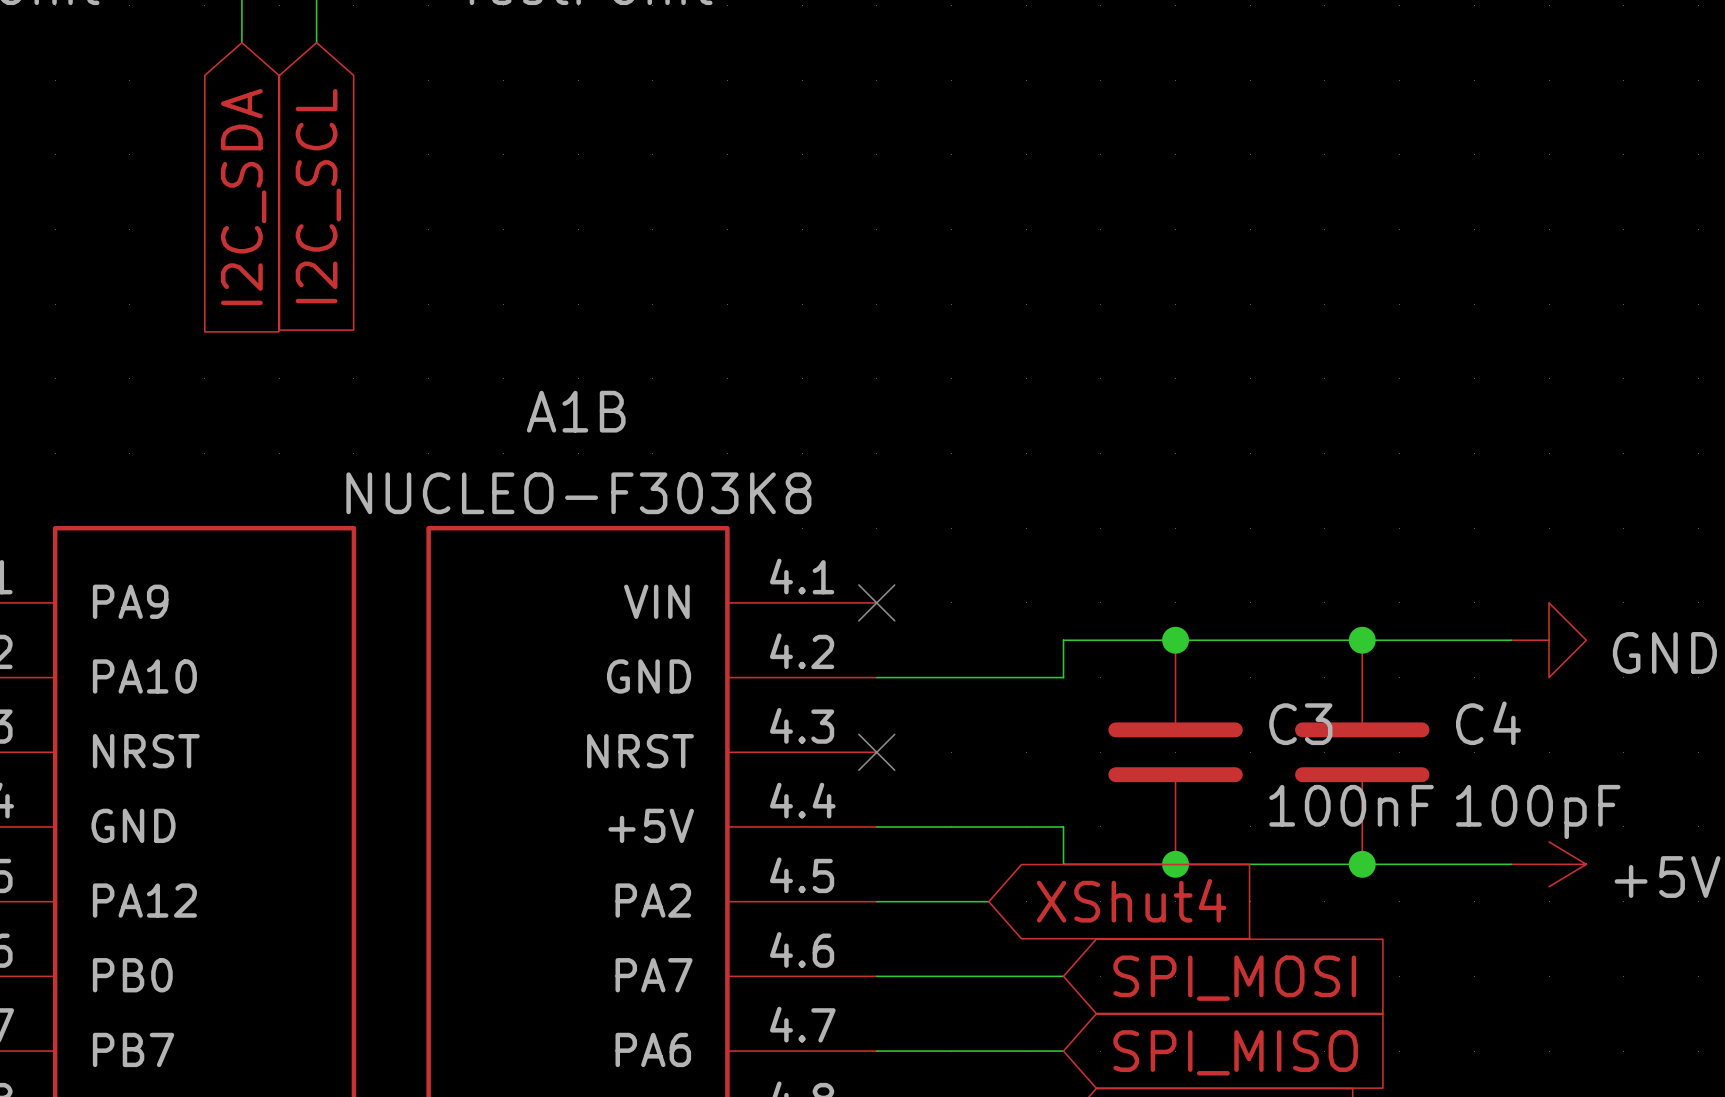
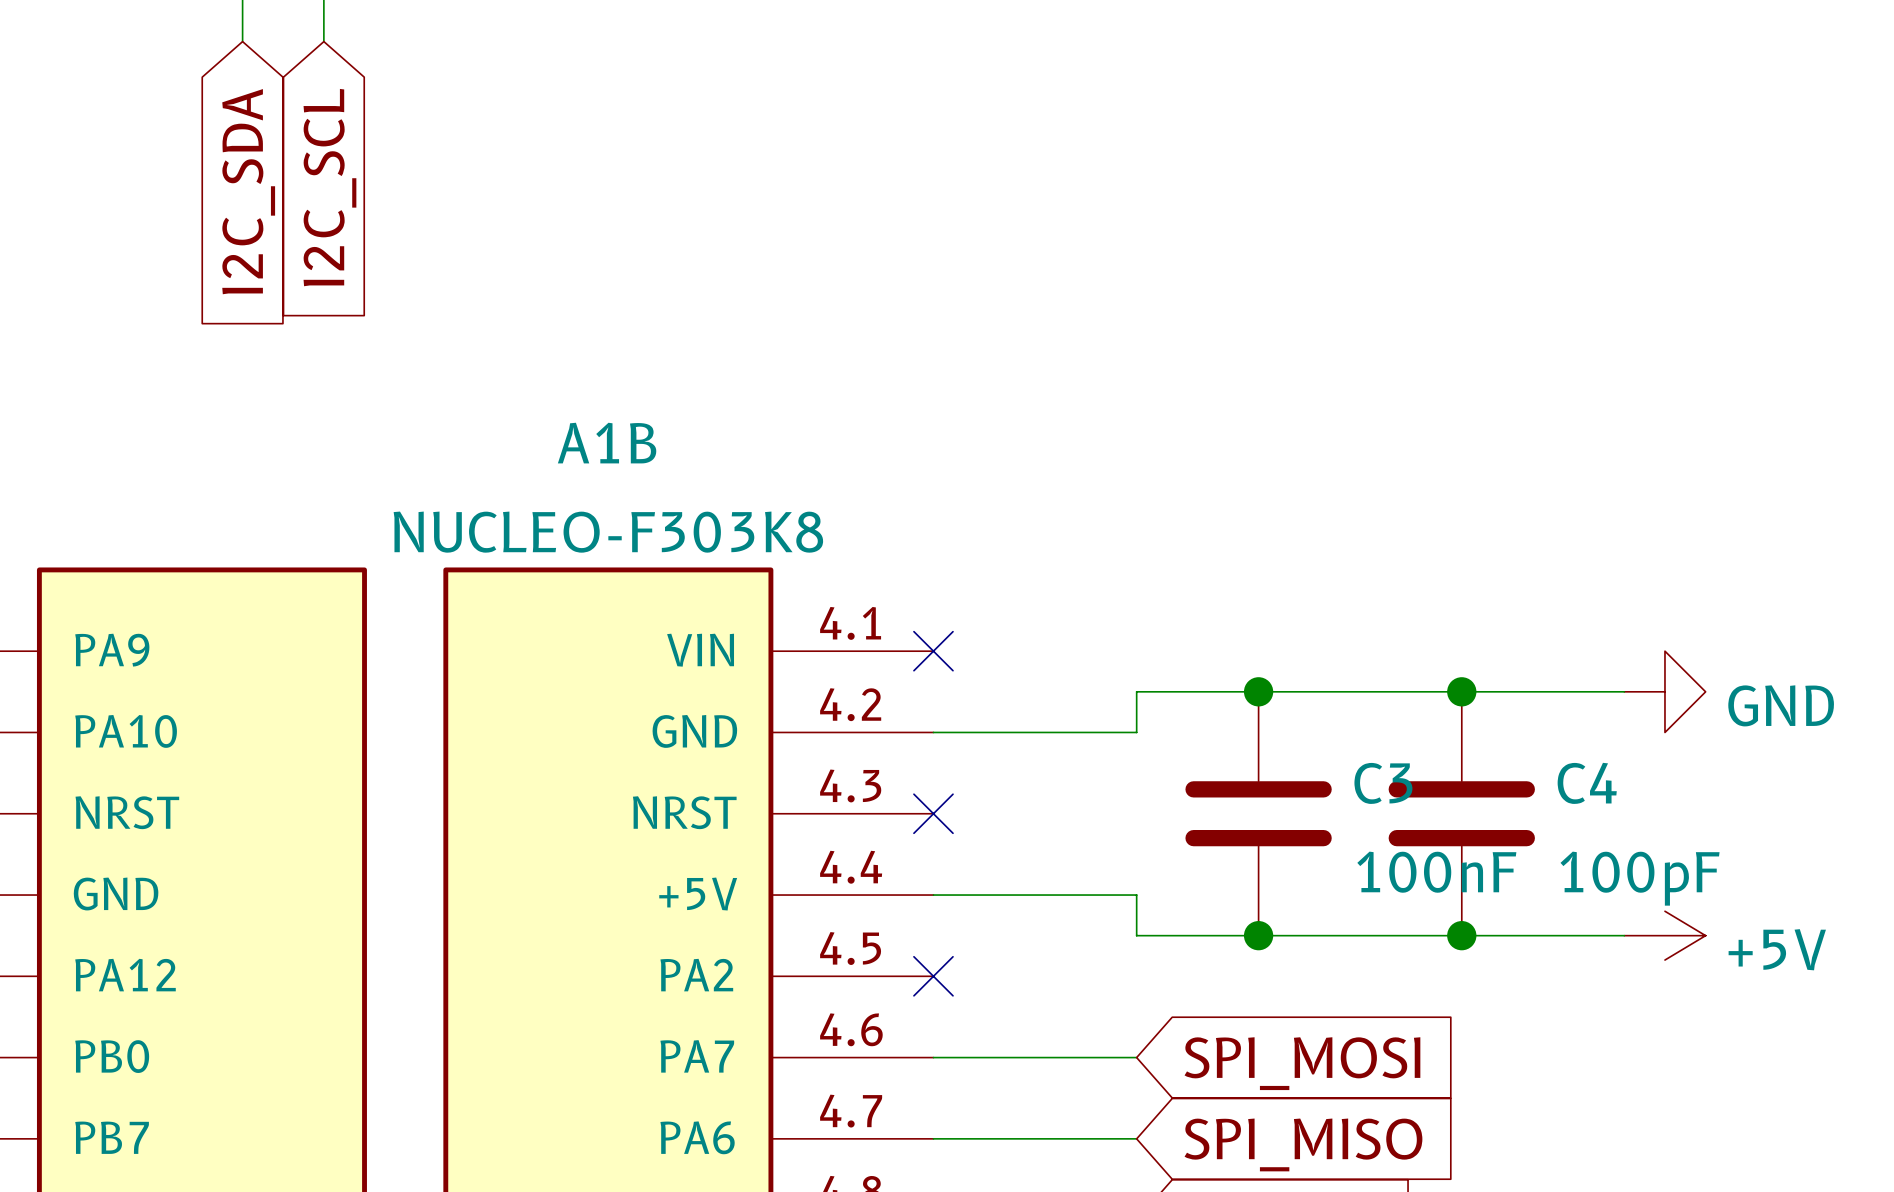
global label: XShut4 (1131, 900) -> none
wire: (876, 901) (988, 901) -> none
no-connect mark: none -> (933, 976)

